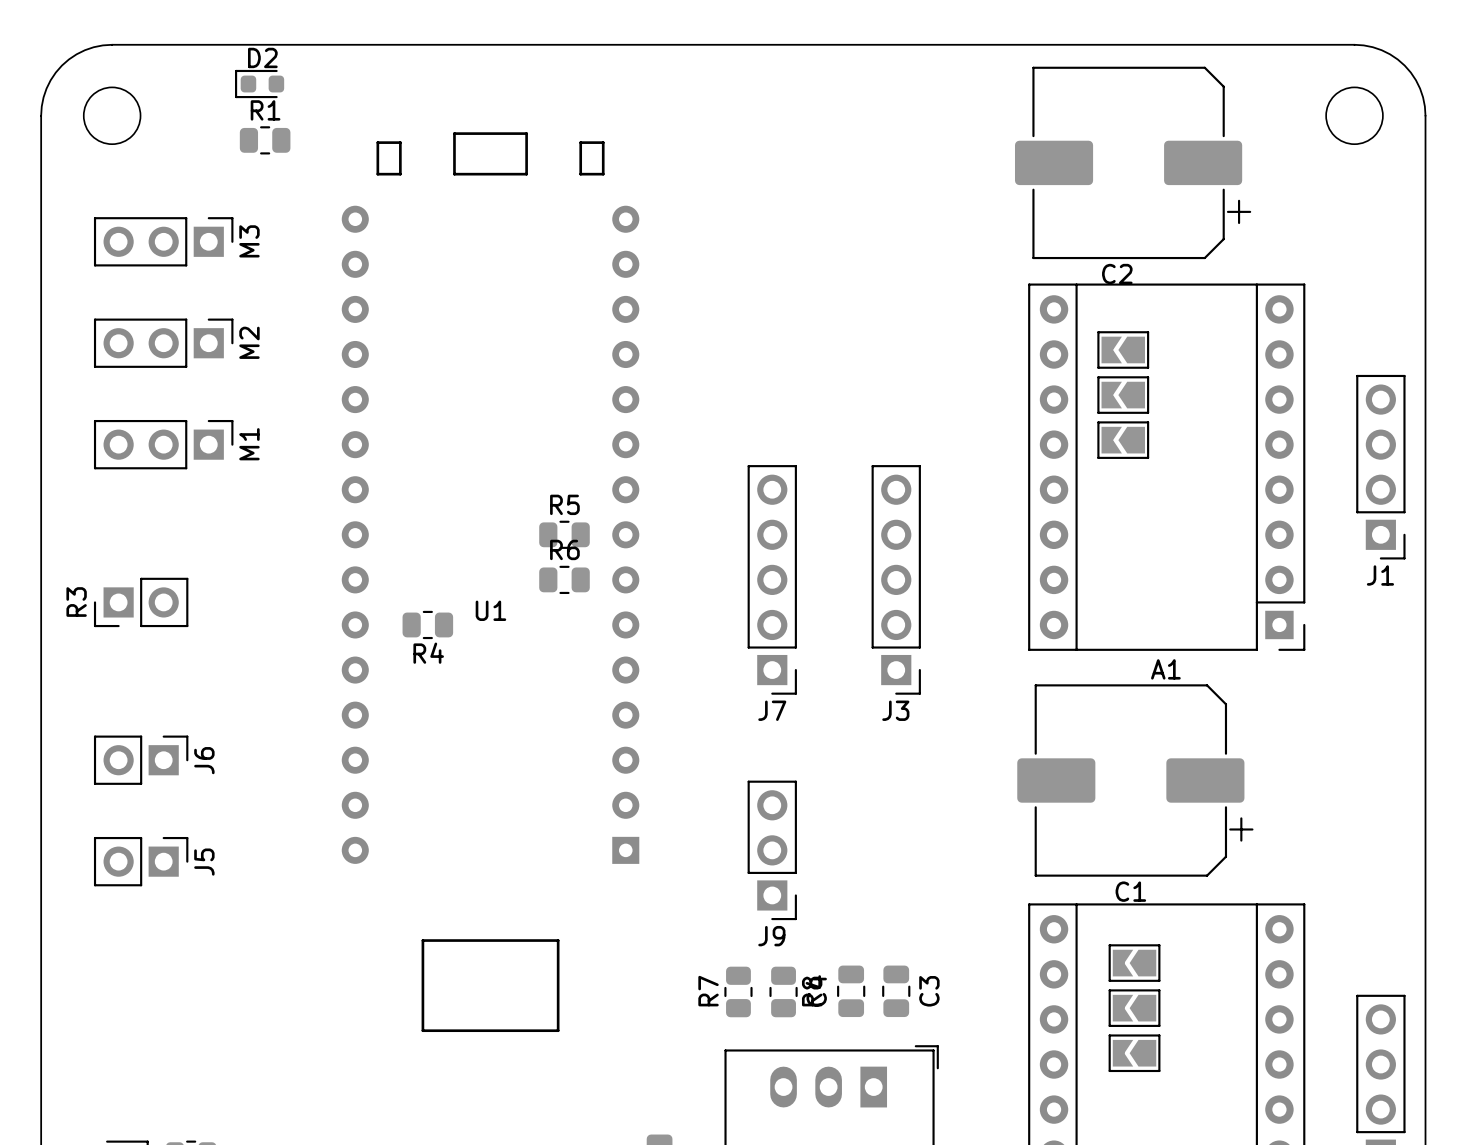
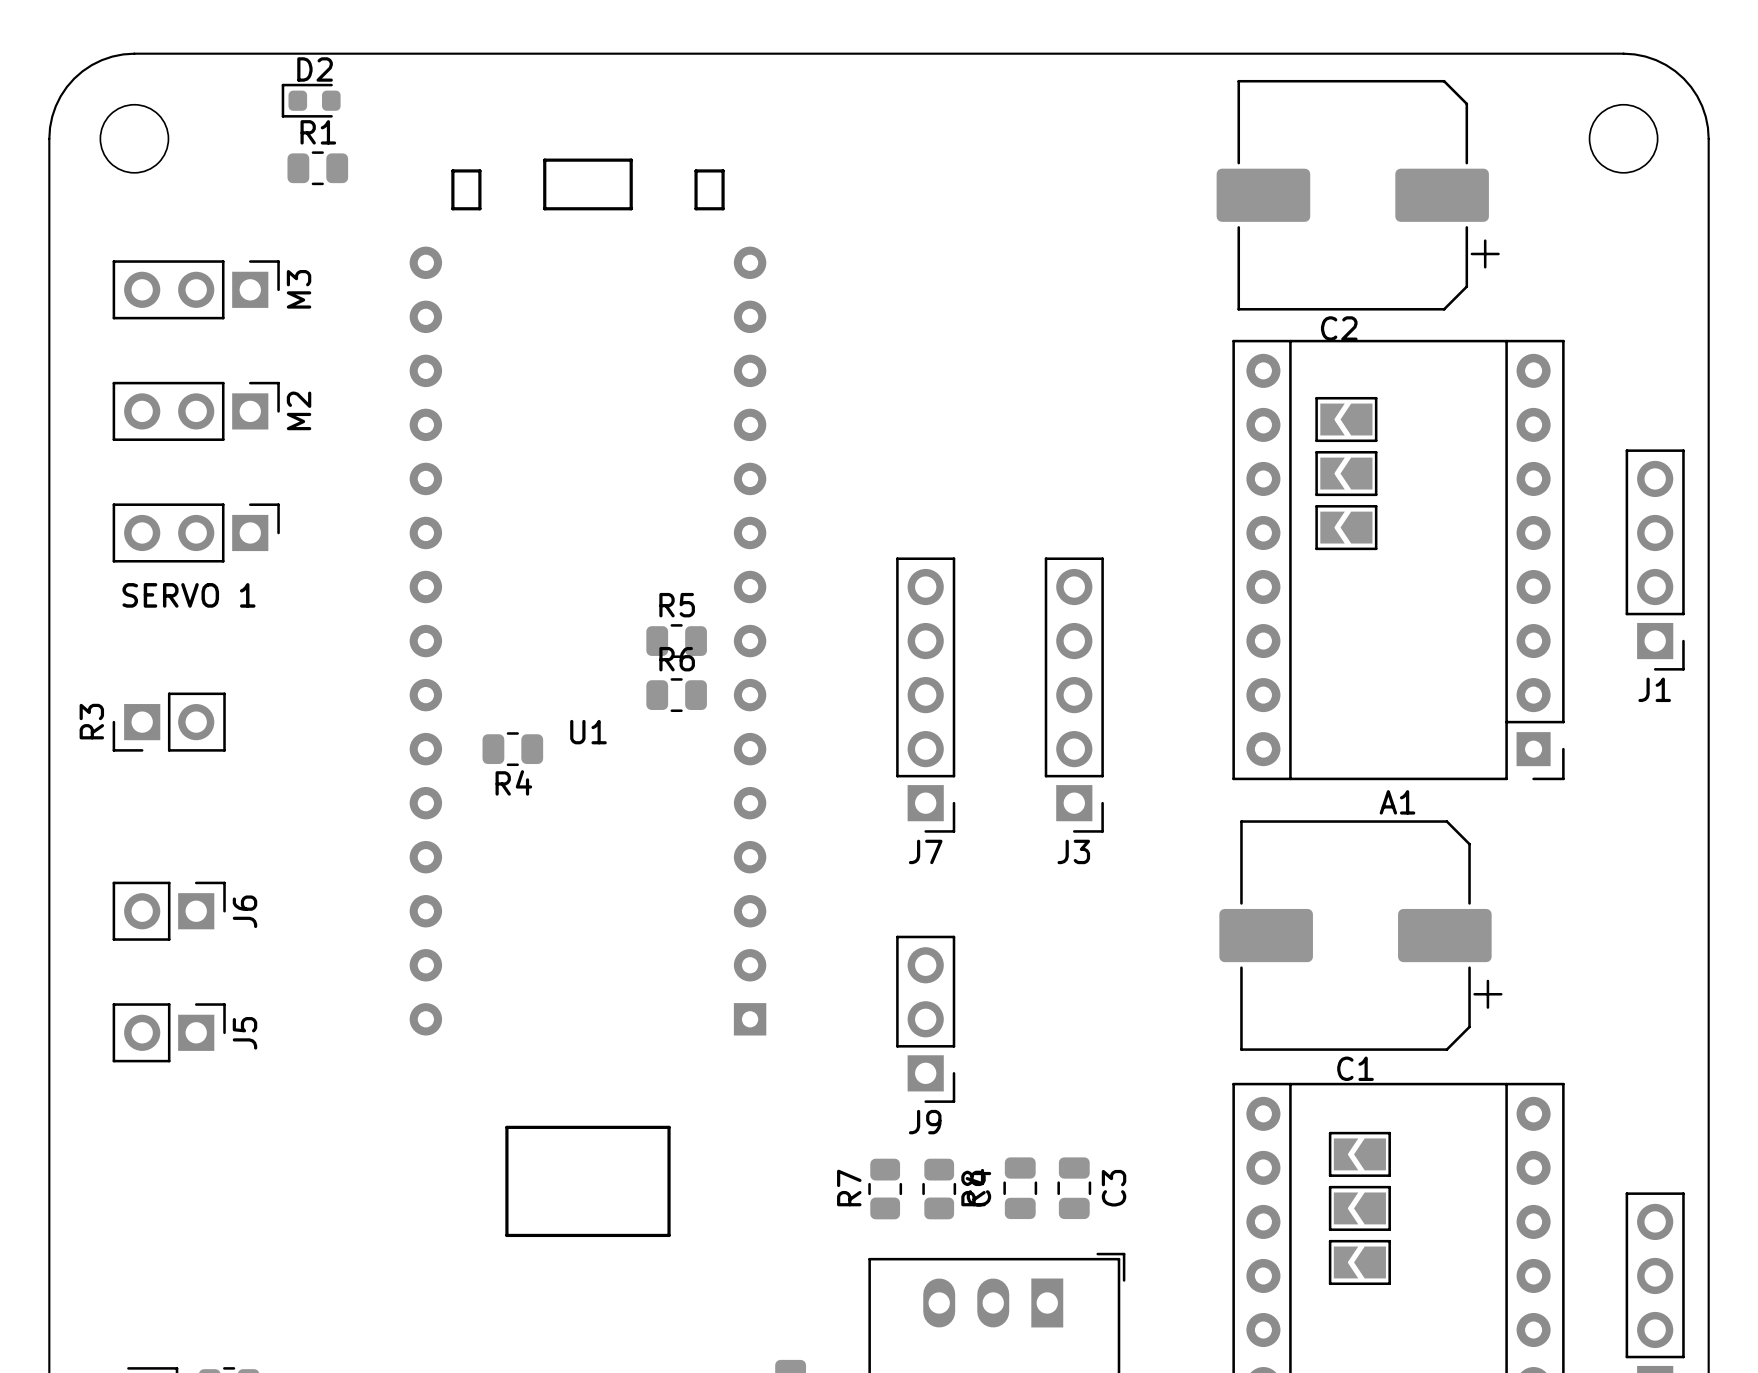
M1 name: M1 (249, 444) -> none
text: none -> SERVO 1 (188, 595)

